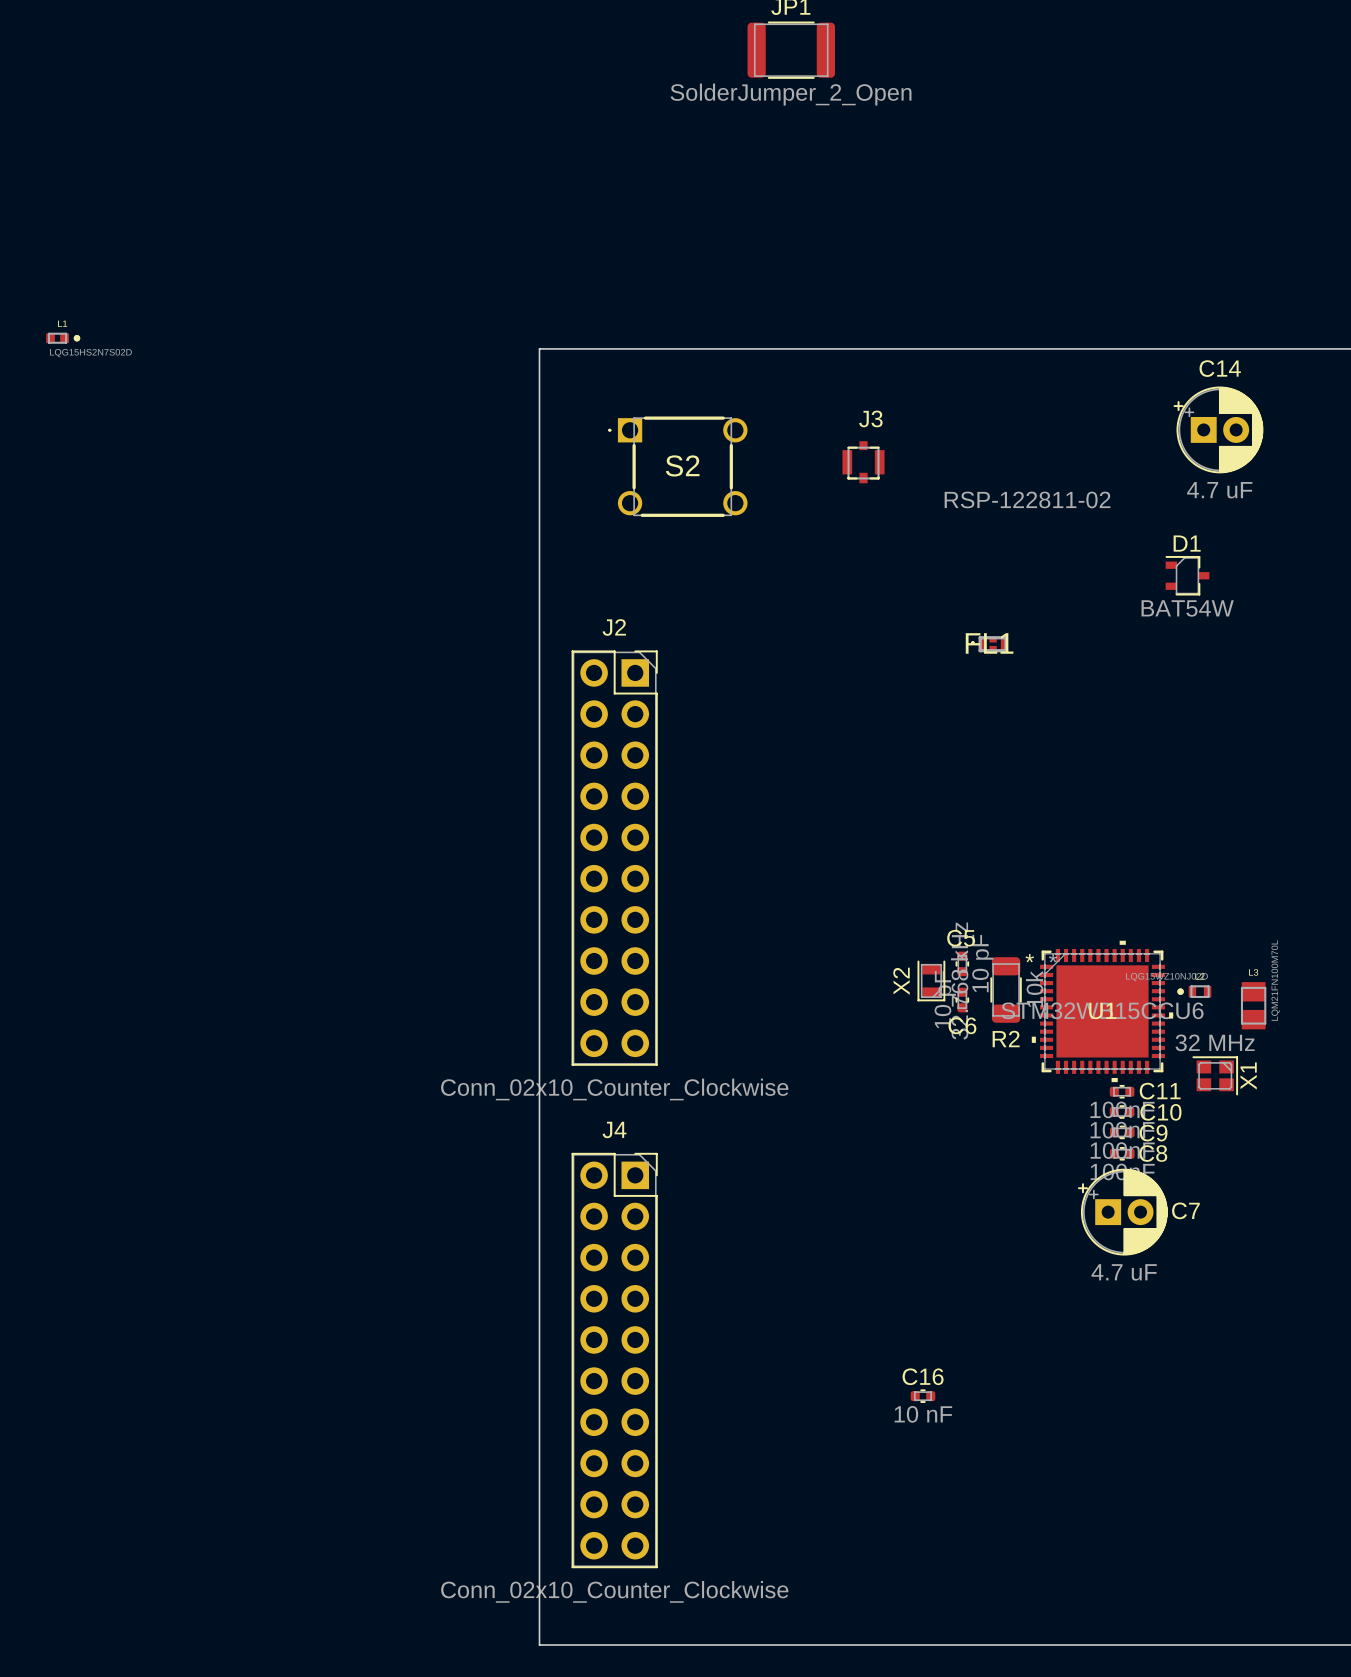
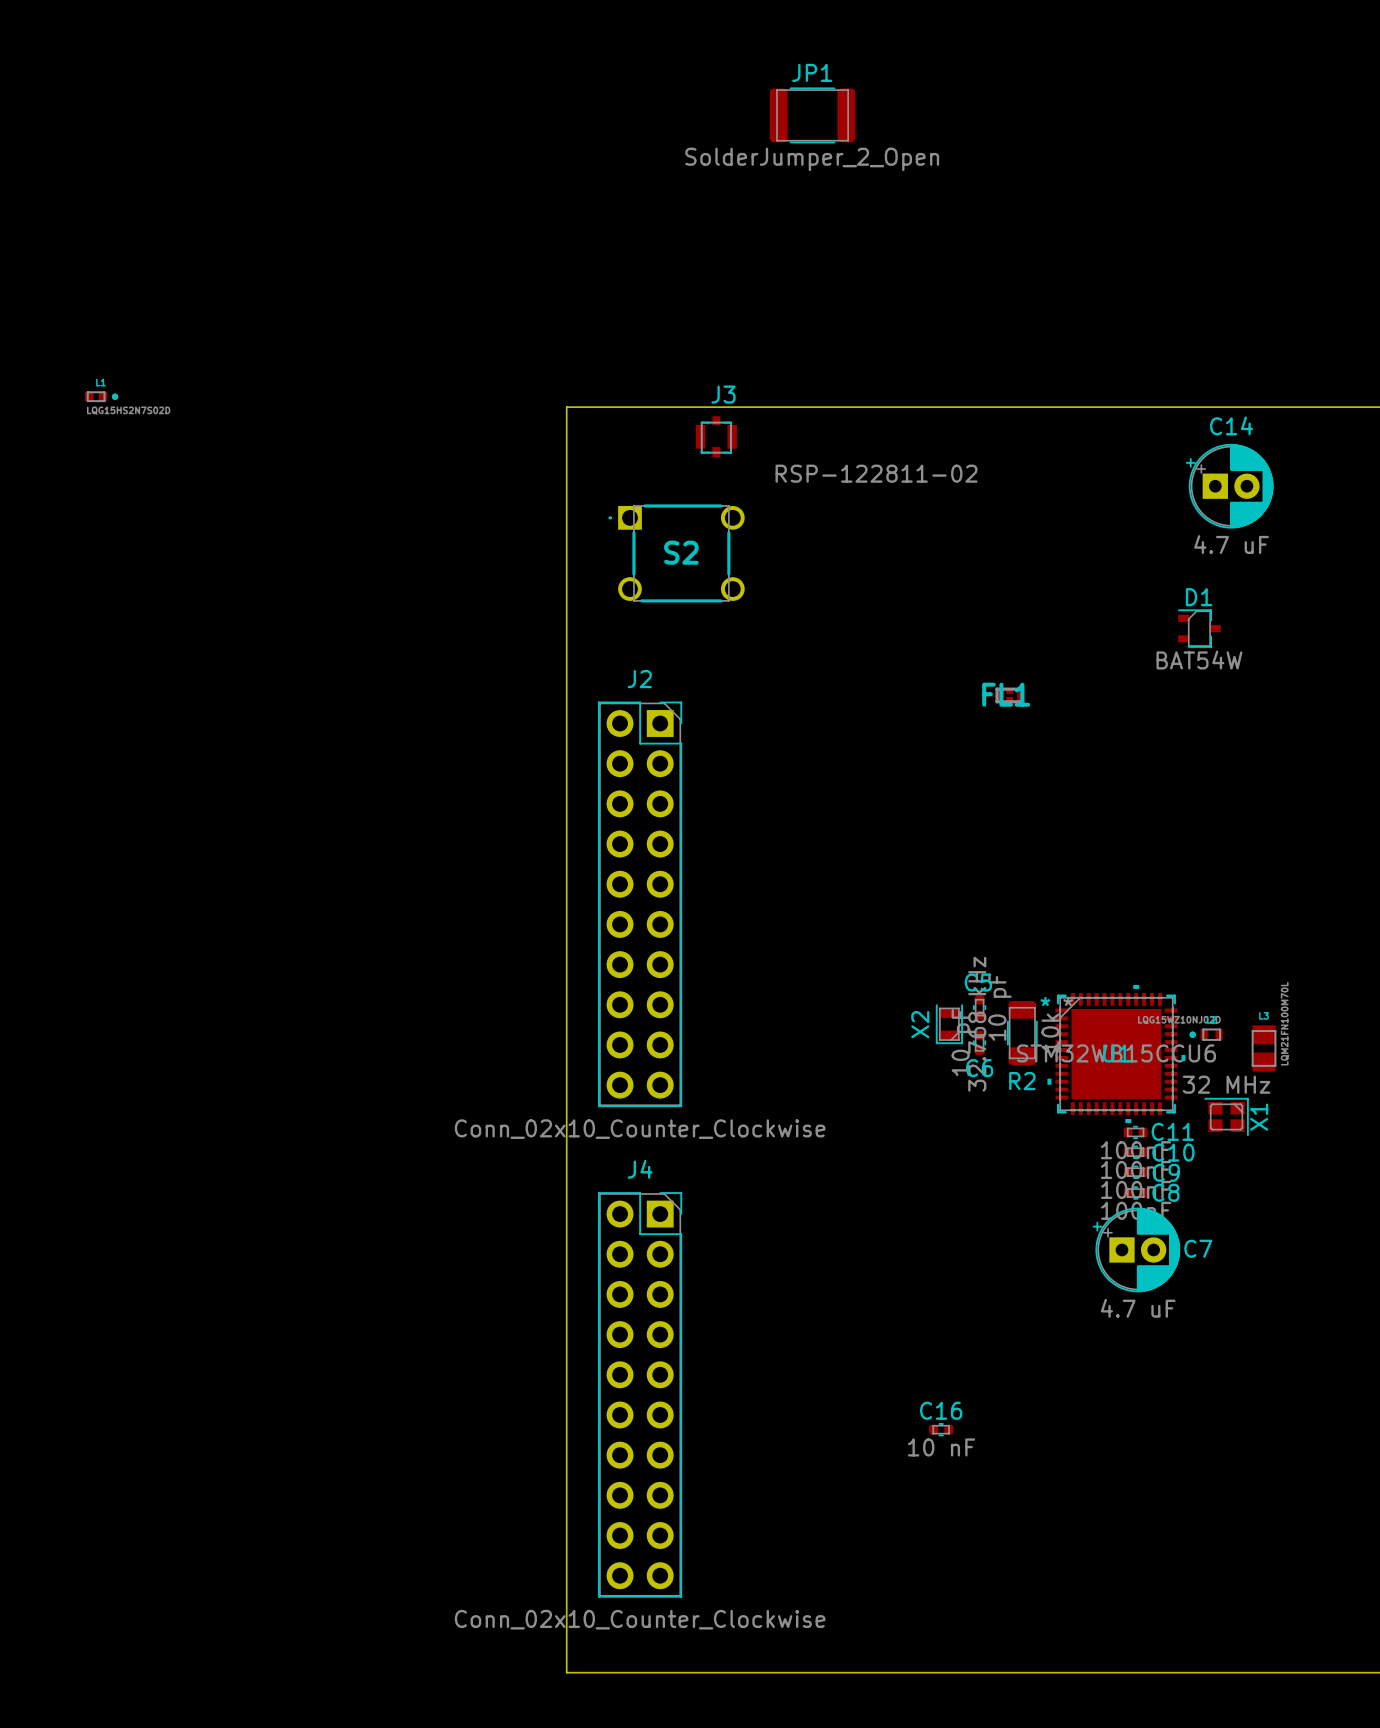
J3 position: (863, 462) -> (716, 436)
S2 position: (677, 466) -> (676, 553)

